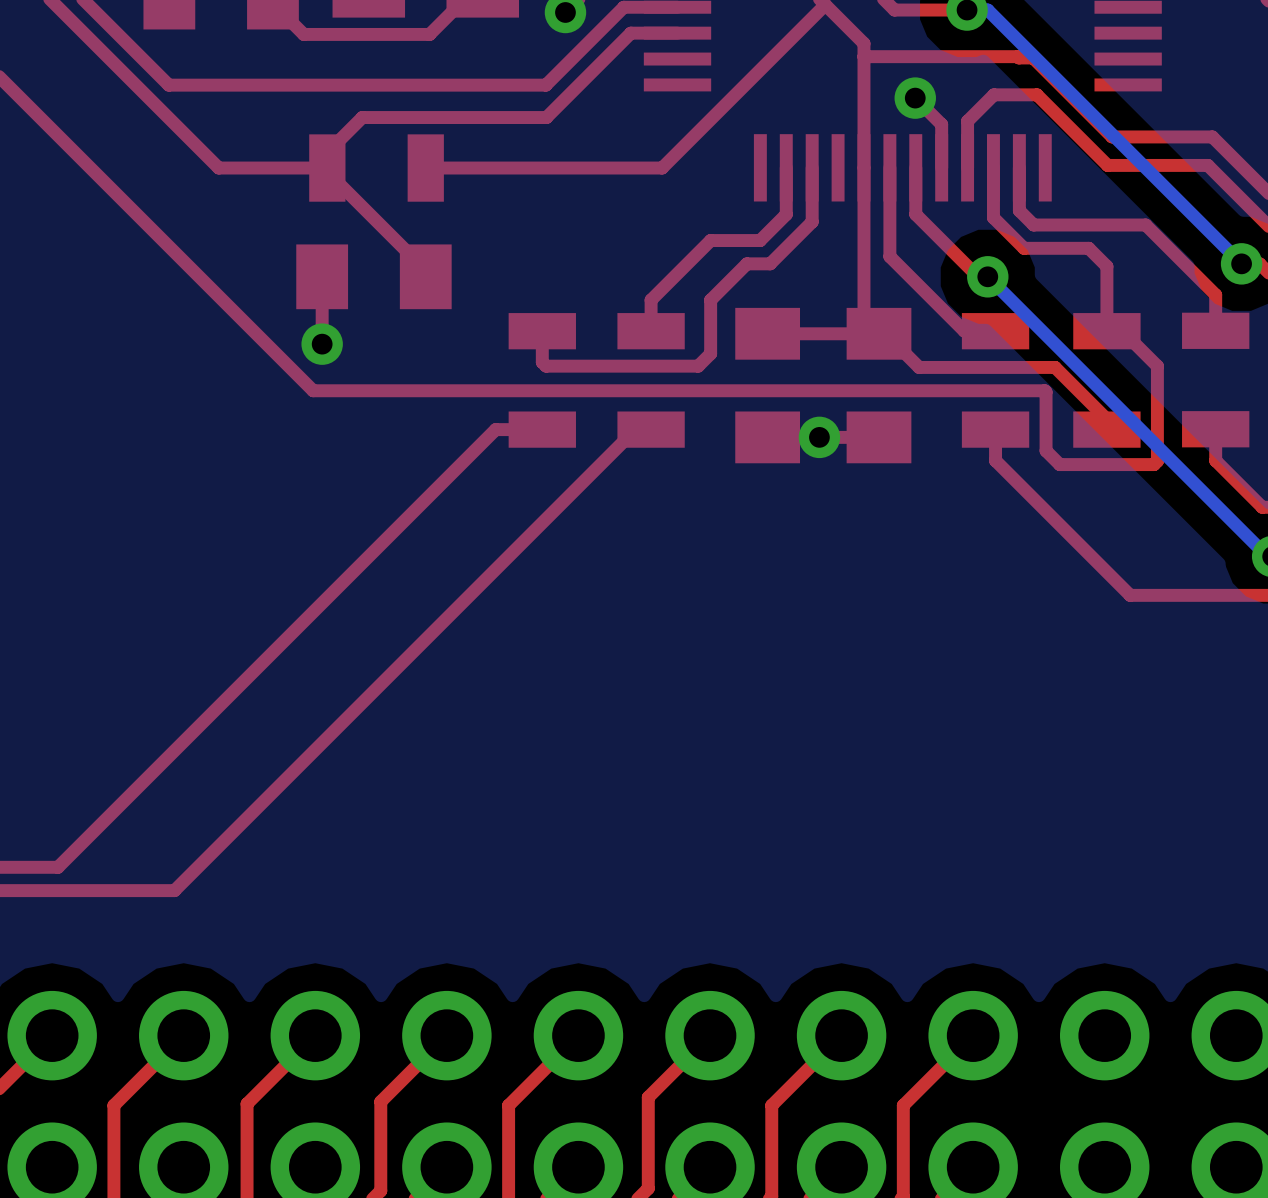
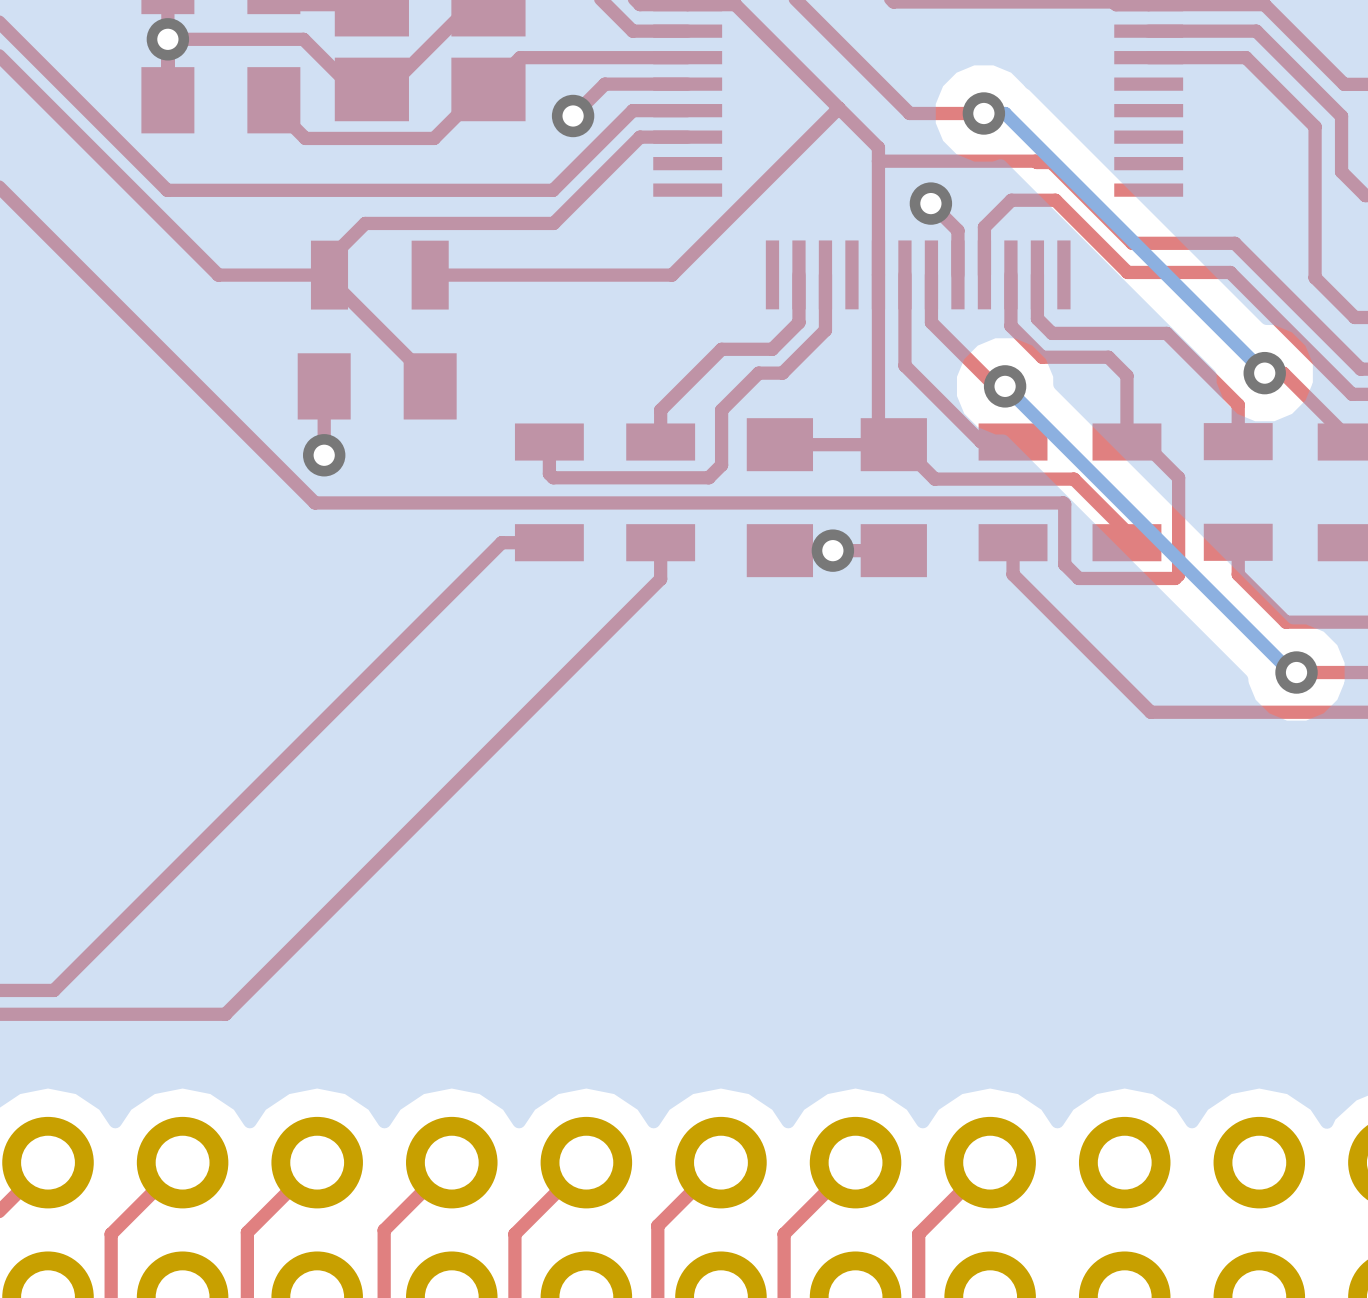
top track: (651, 429) (635, 429) (174, 890) -> (660, 542) (660, 579) (225, 1014) (173, 1014)

